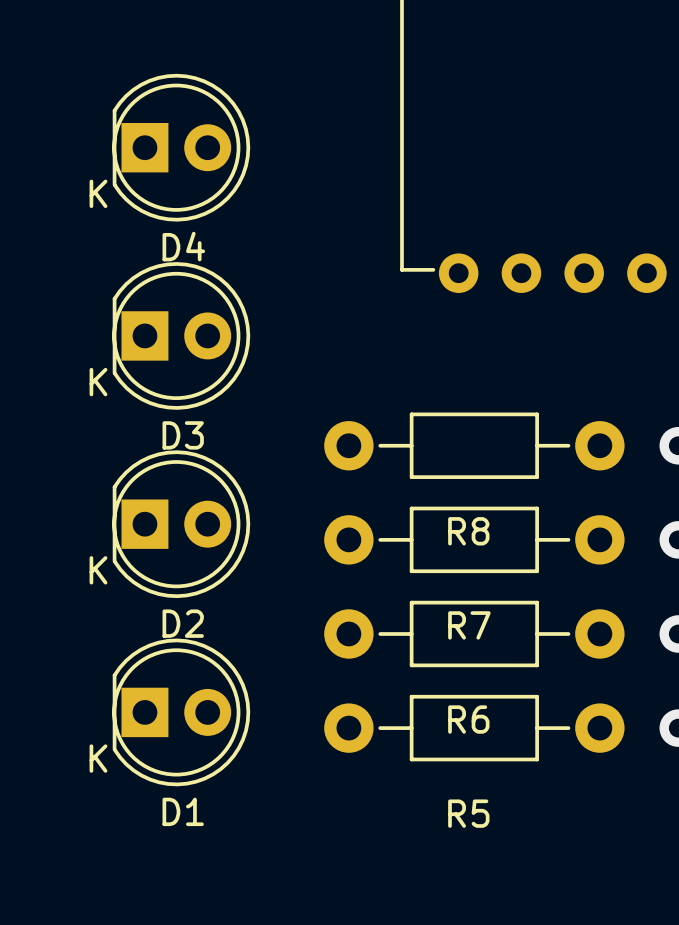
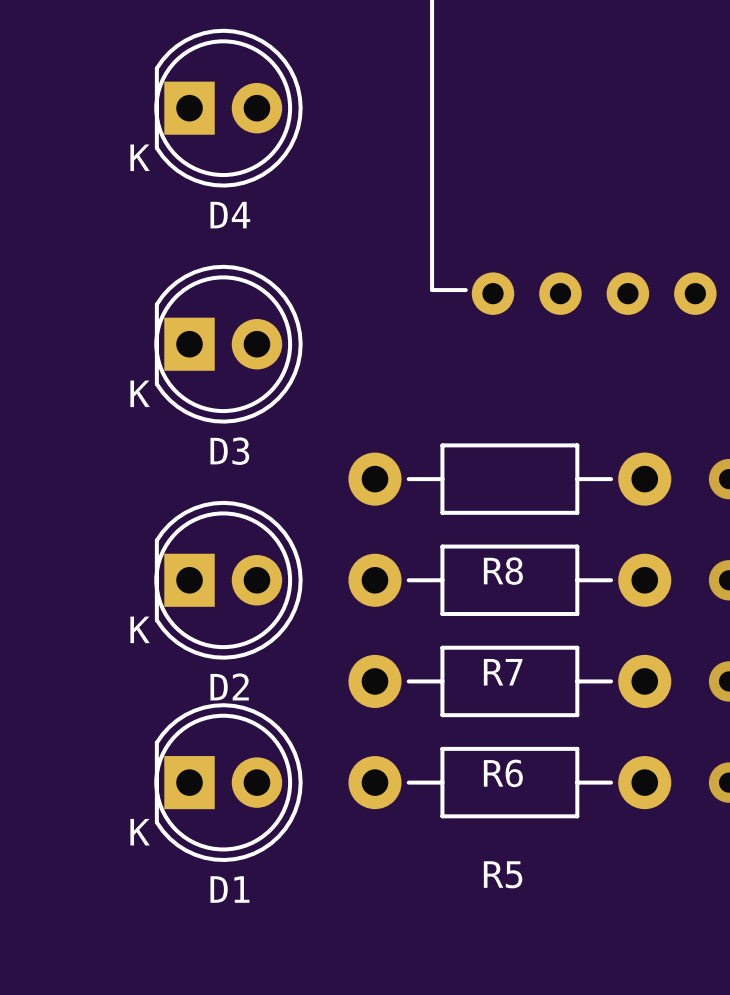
D4 position: (181, 147) -> (228, 108)
D3 position: (181, 335) -> (228, 344)
D2 position: (181, 524) -> (228, 580)
D1 position: (181, 712) -> (228, 782)

